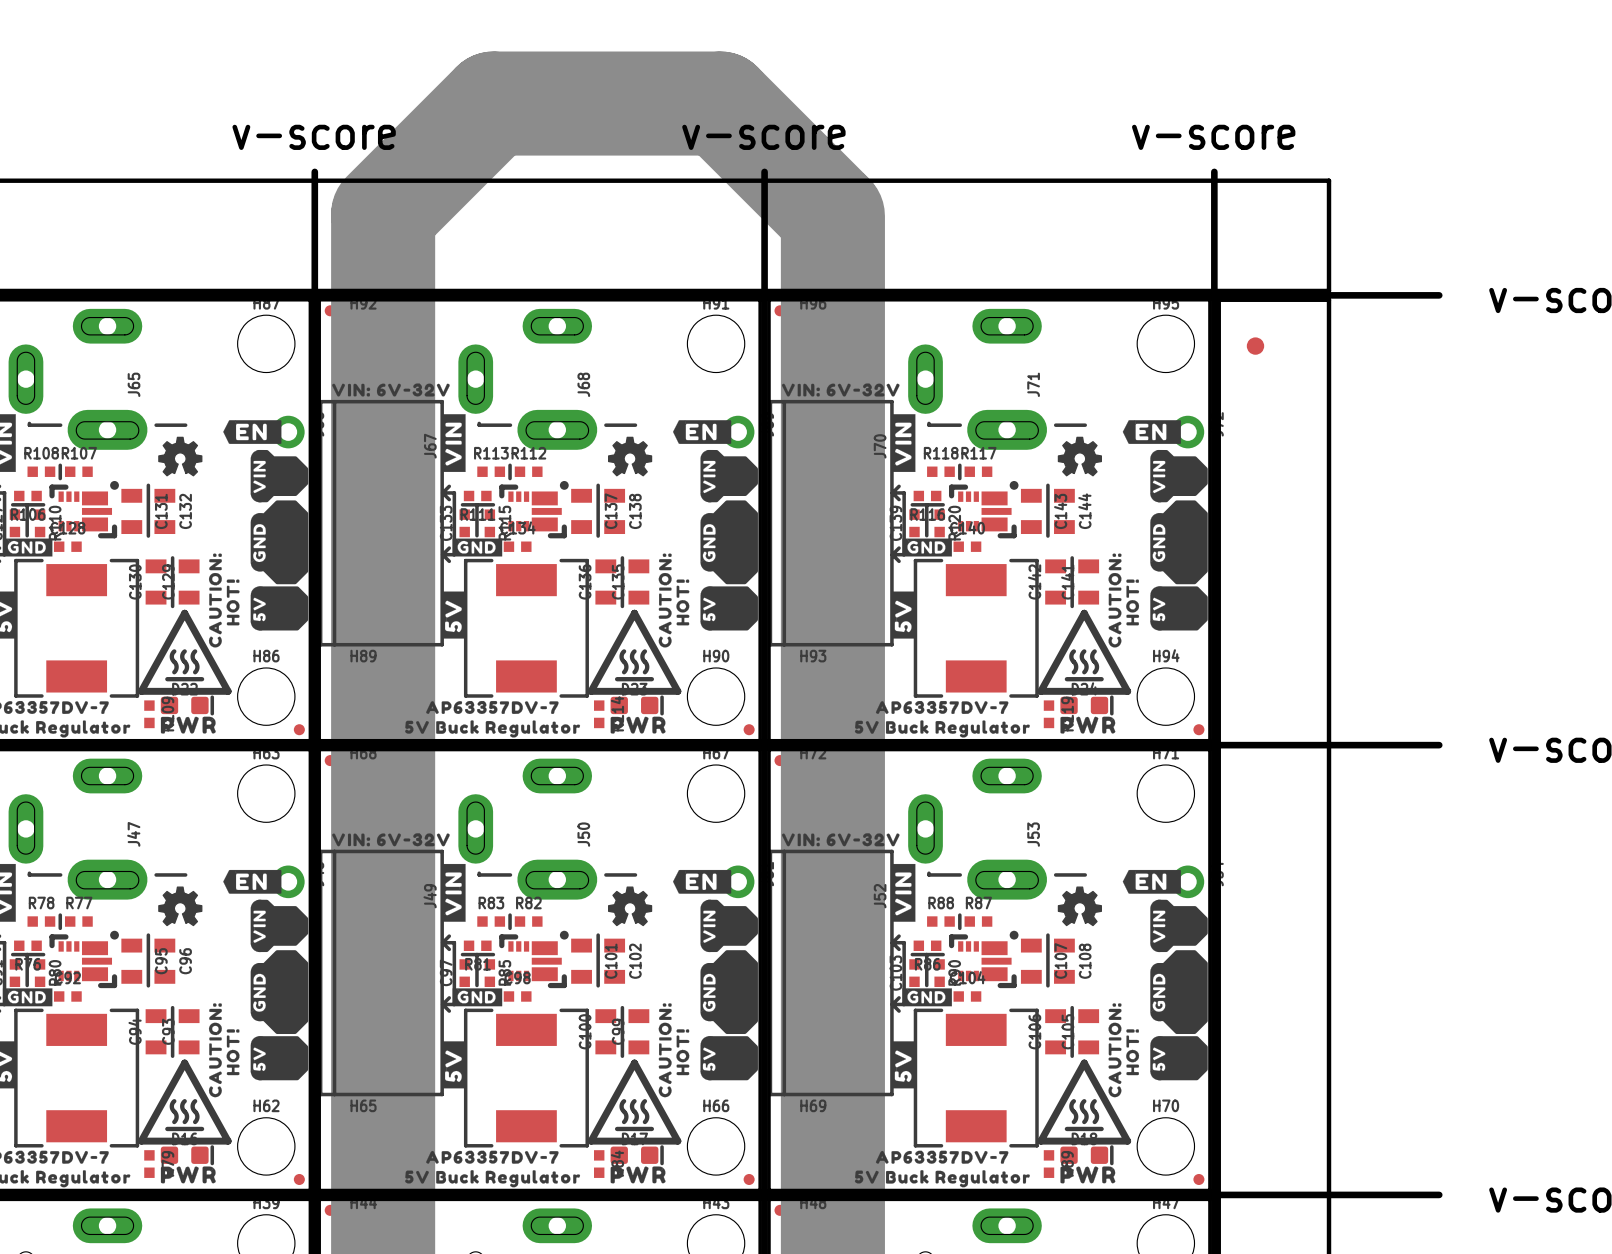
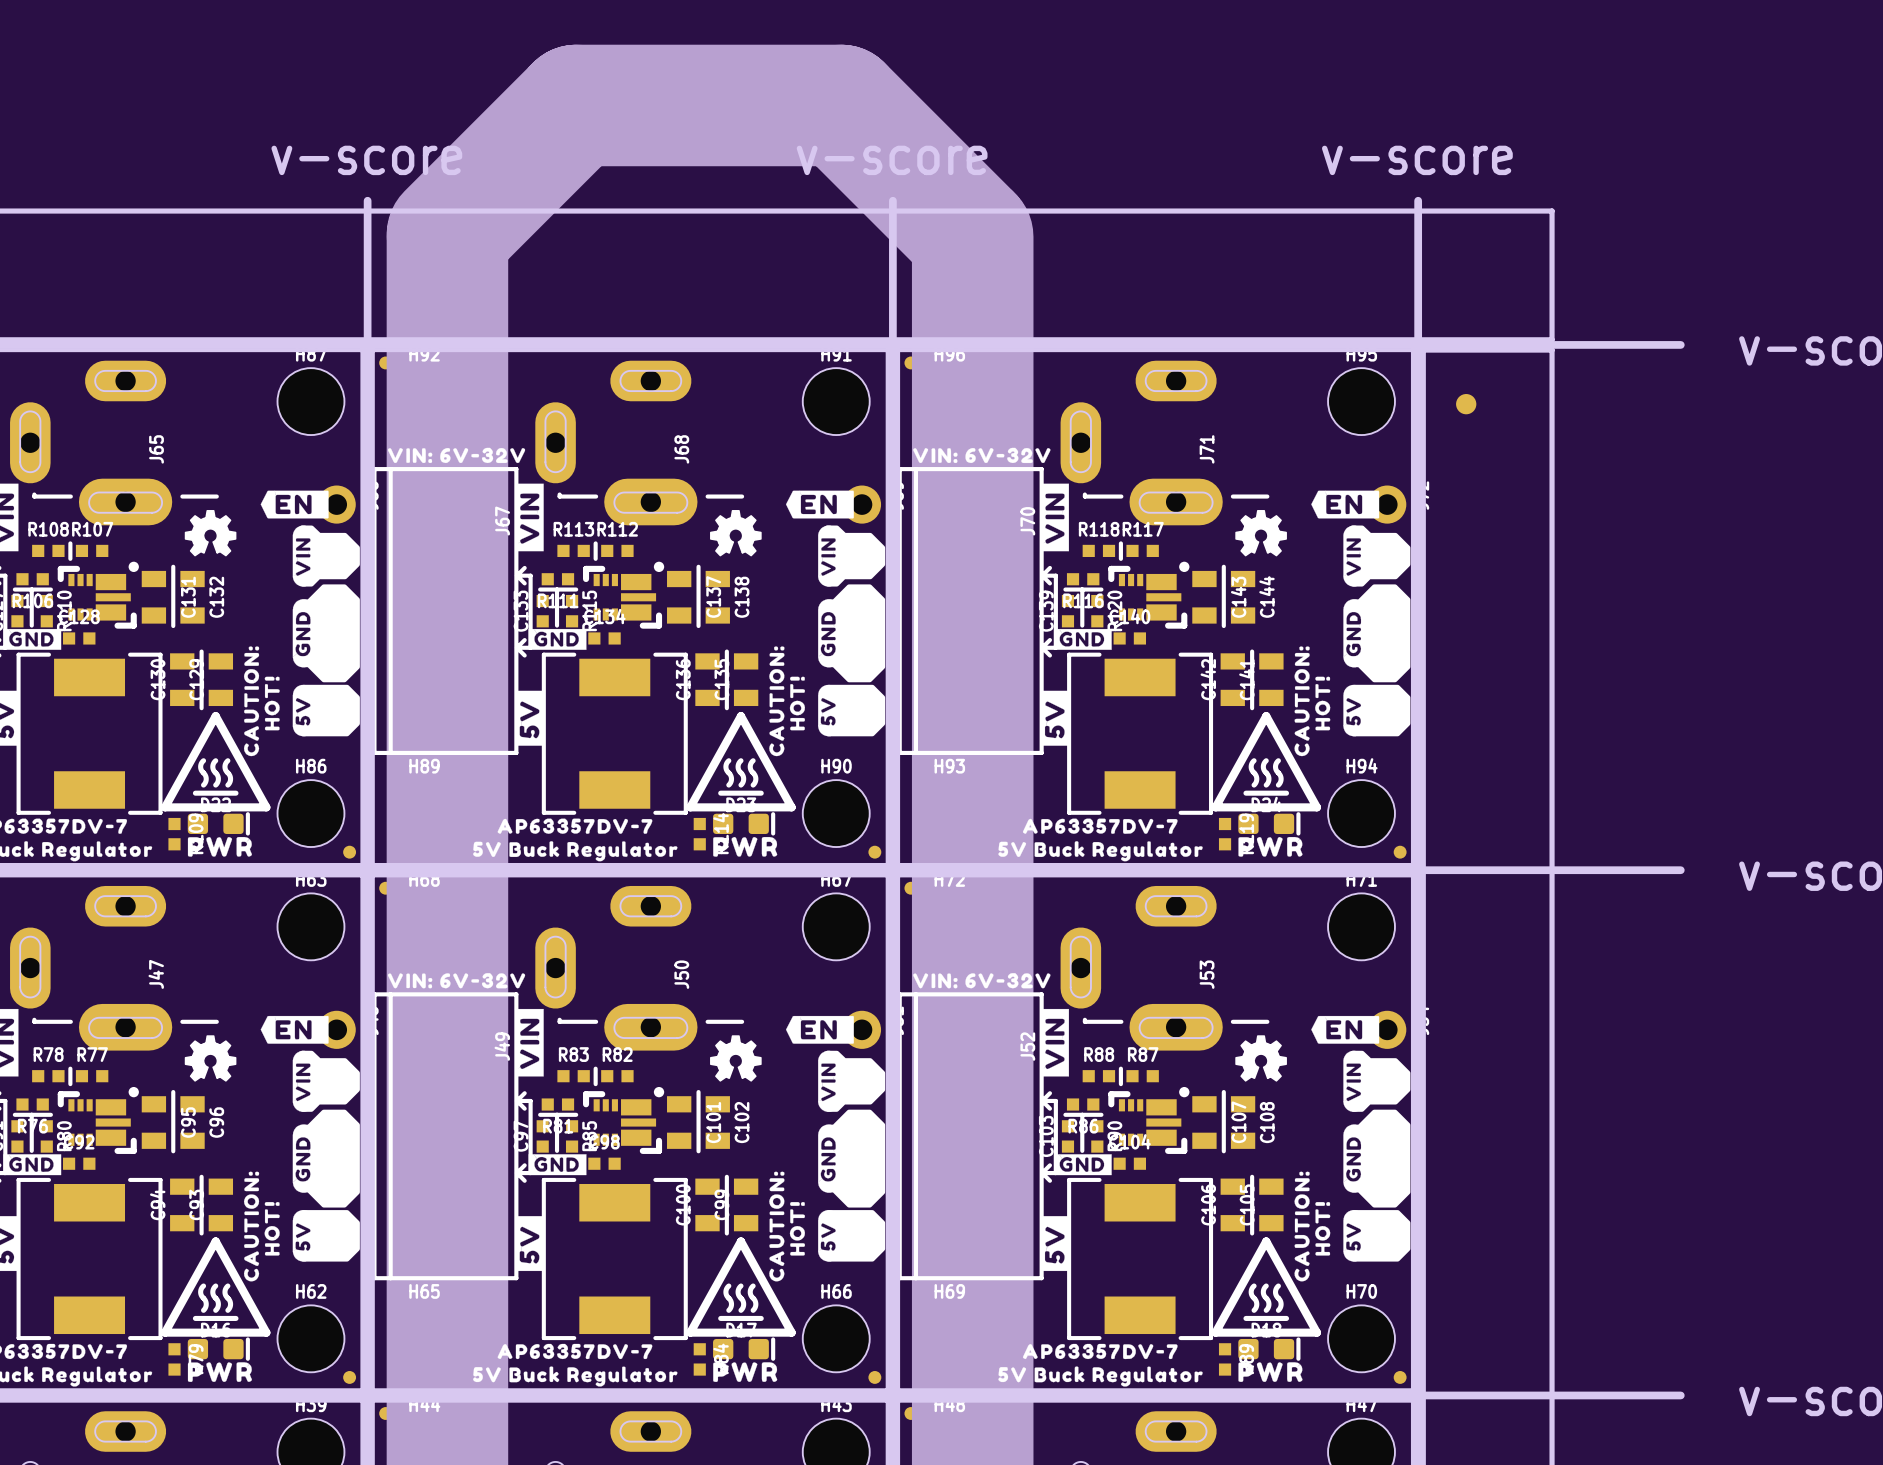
line: (383, 213) (493, 103) (720, 103) (830, 213) -> (447, 234) (576, 105) (841, 105) (970, 234)

